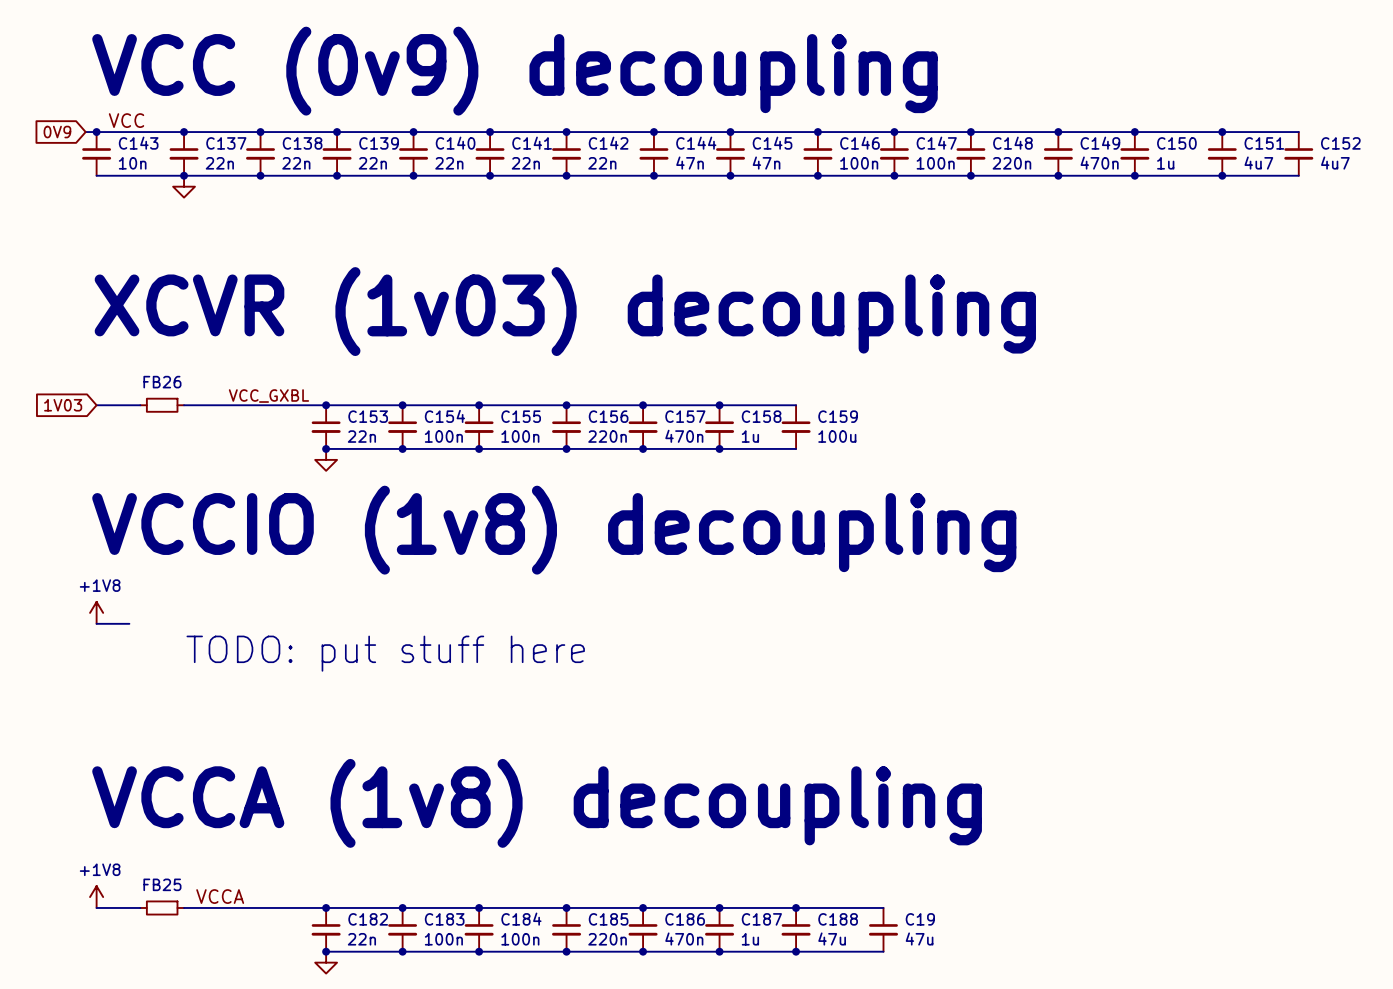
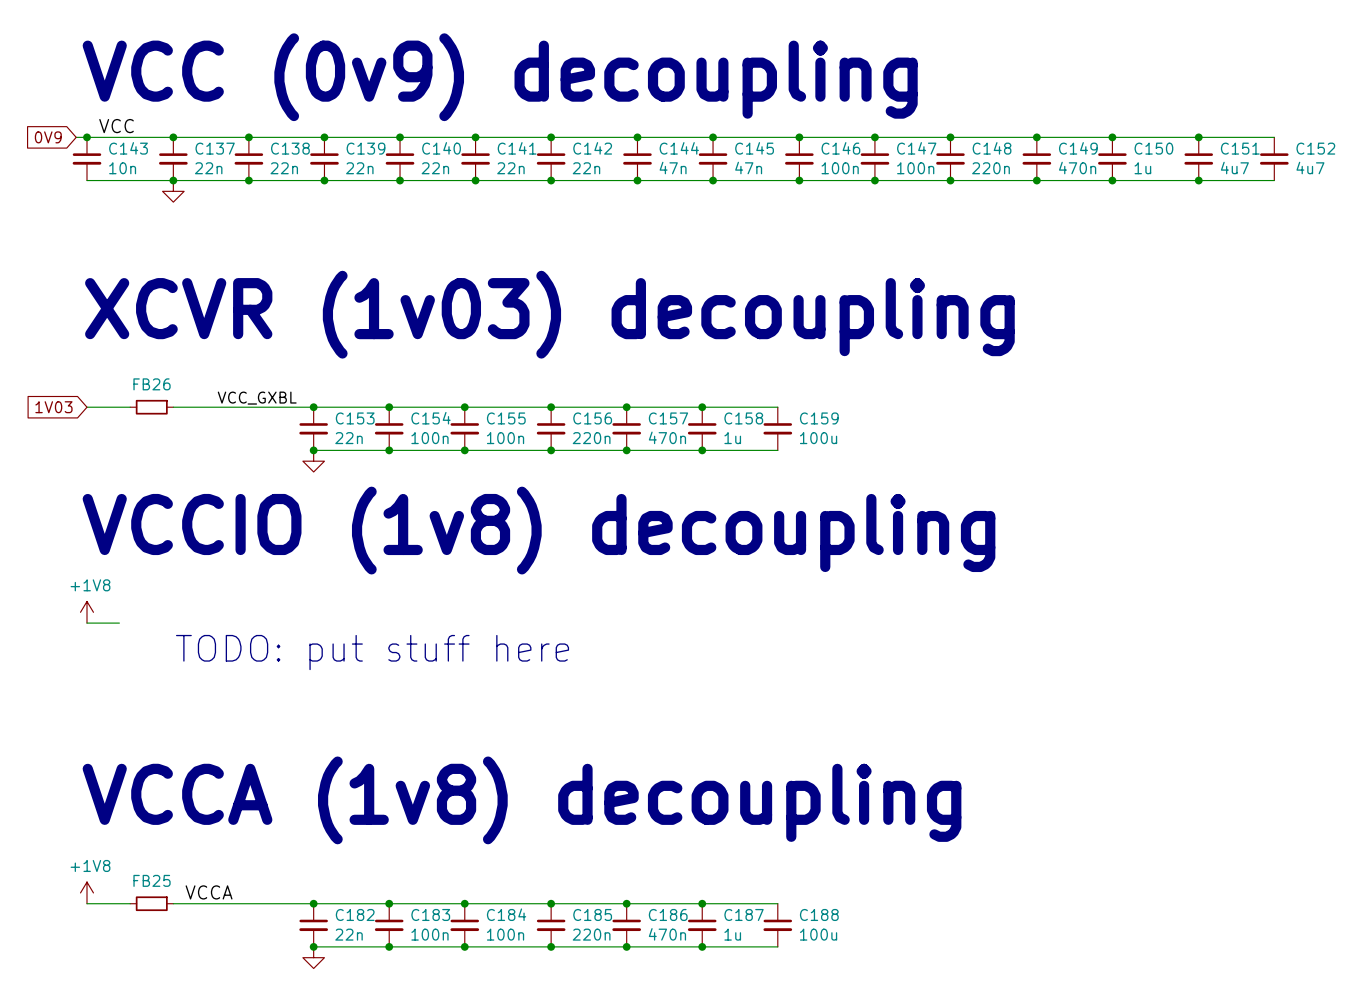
wire: (796, 907) (883, 907) -> none
junction: (796, 907) -> none
C19: 47u (883, 929) -> none
C188 value: 47u (832, 939) -> 100u (818, 934)
wire: (796, 951) (883, 951) -> none
junction: (796, 951) -> none

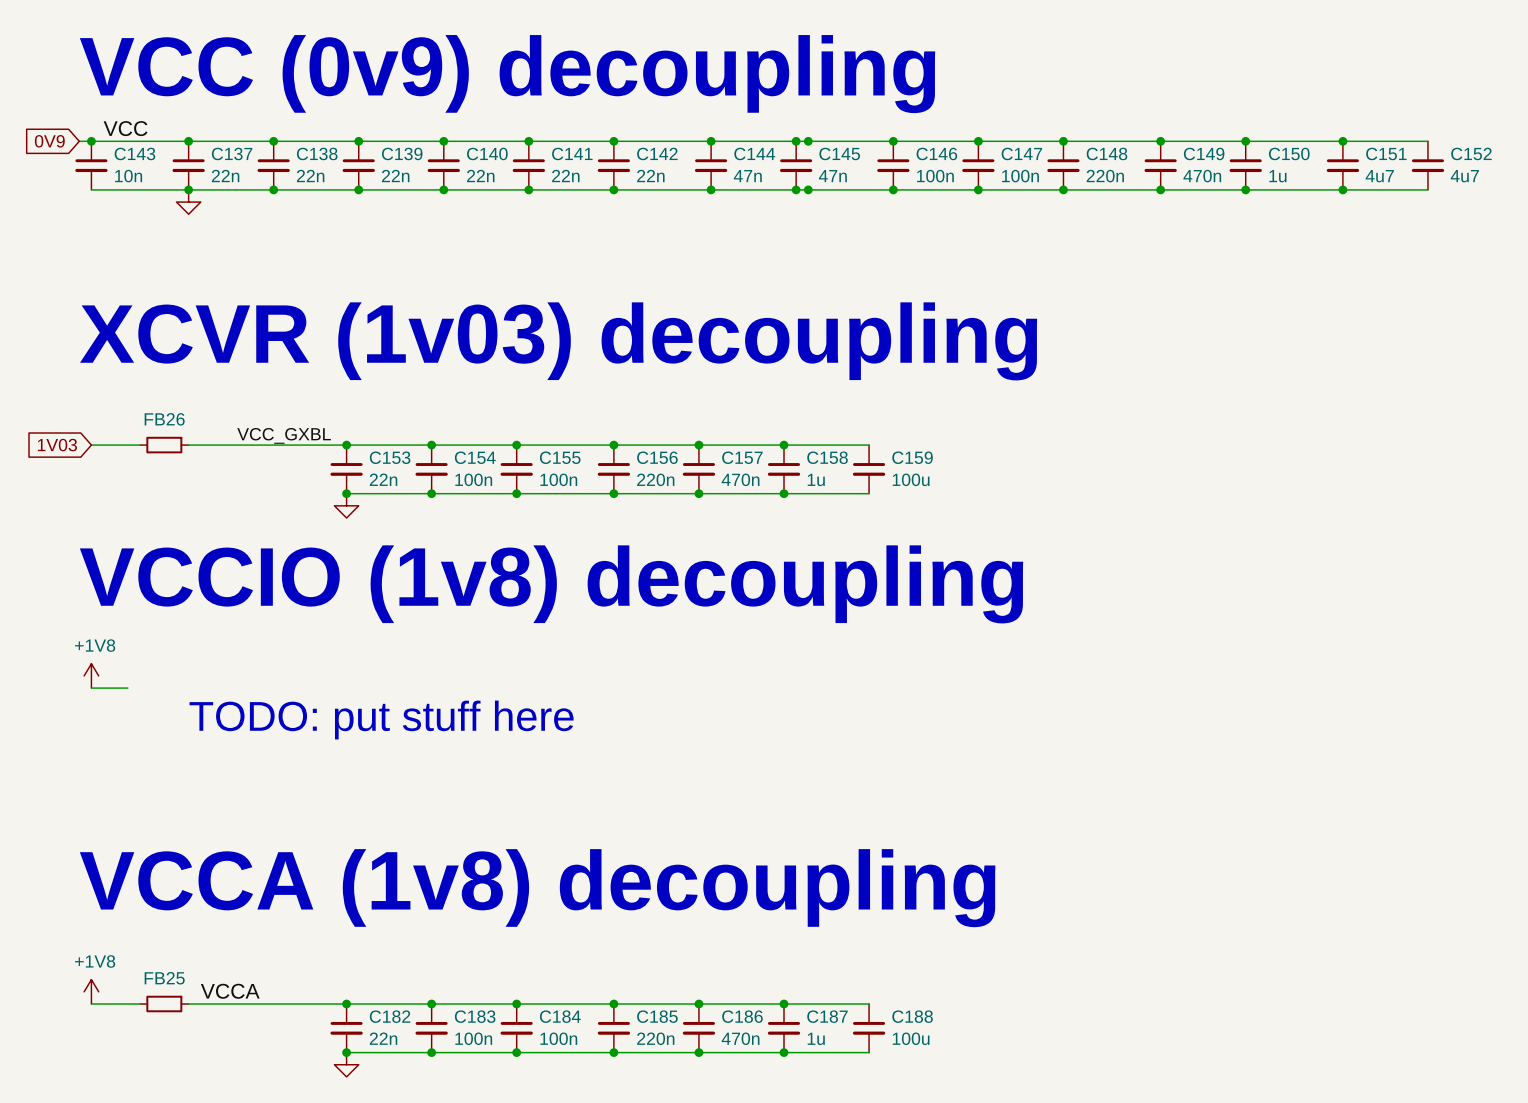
junction: none -> (808, 141)
junction: none -> (808, 189)

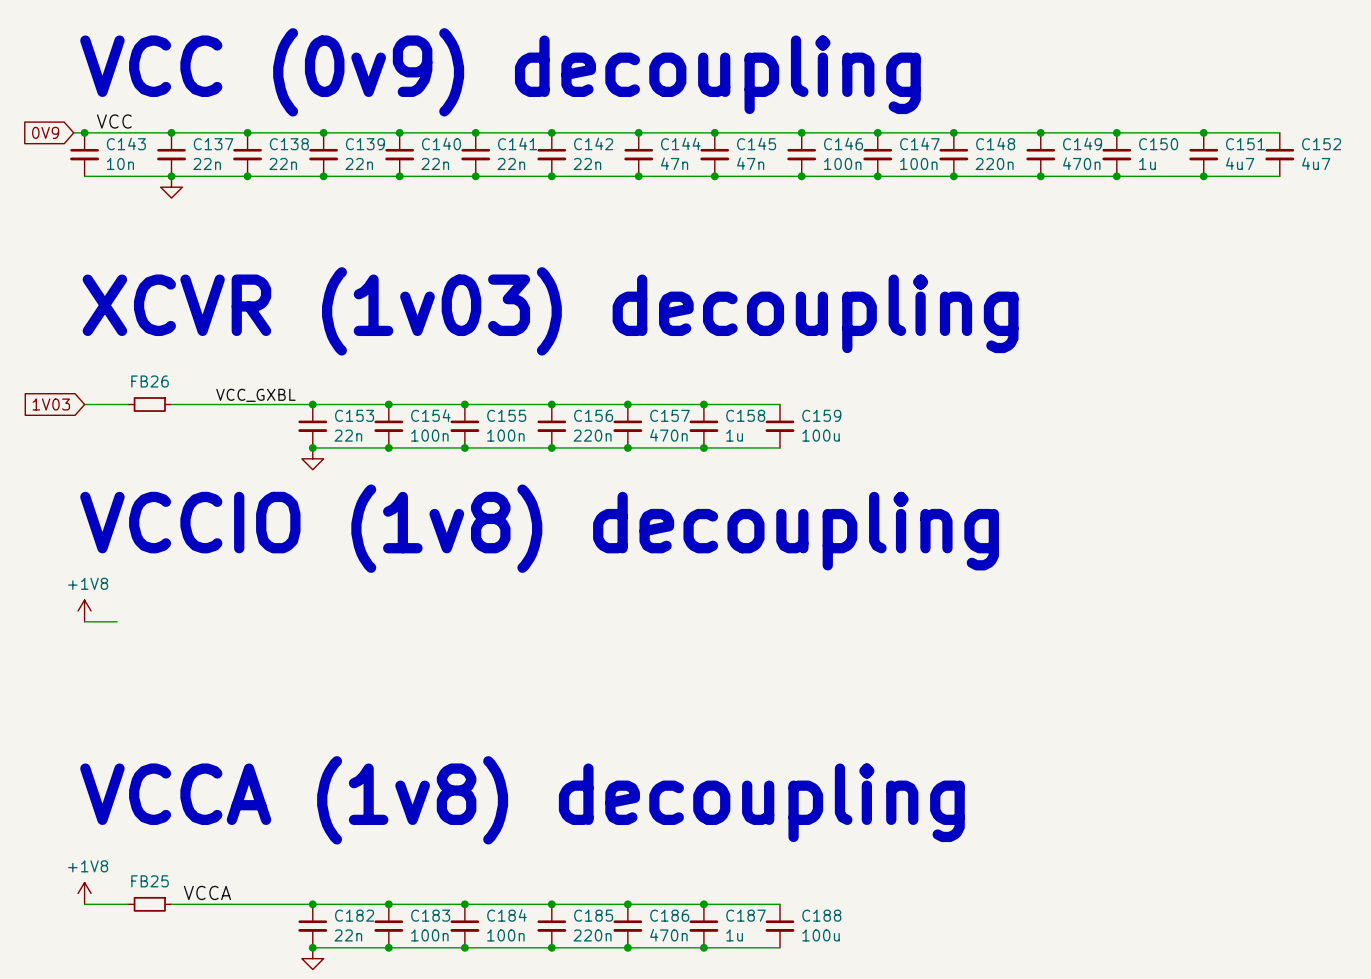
junction: (808, 141) -> none
junction: (808, 189) -> none
text: TODO: put stuff here (381, 720) -> none

